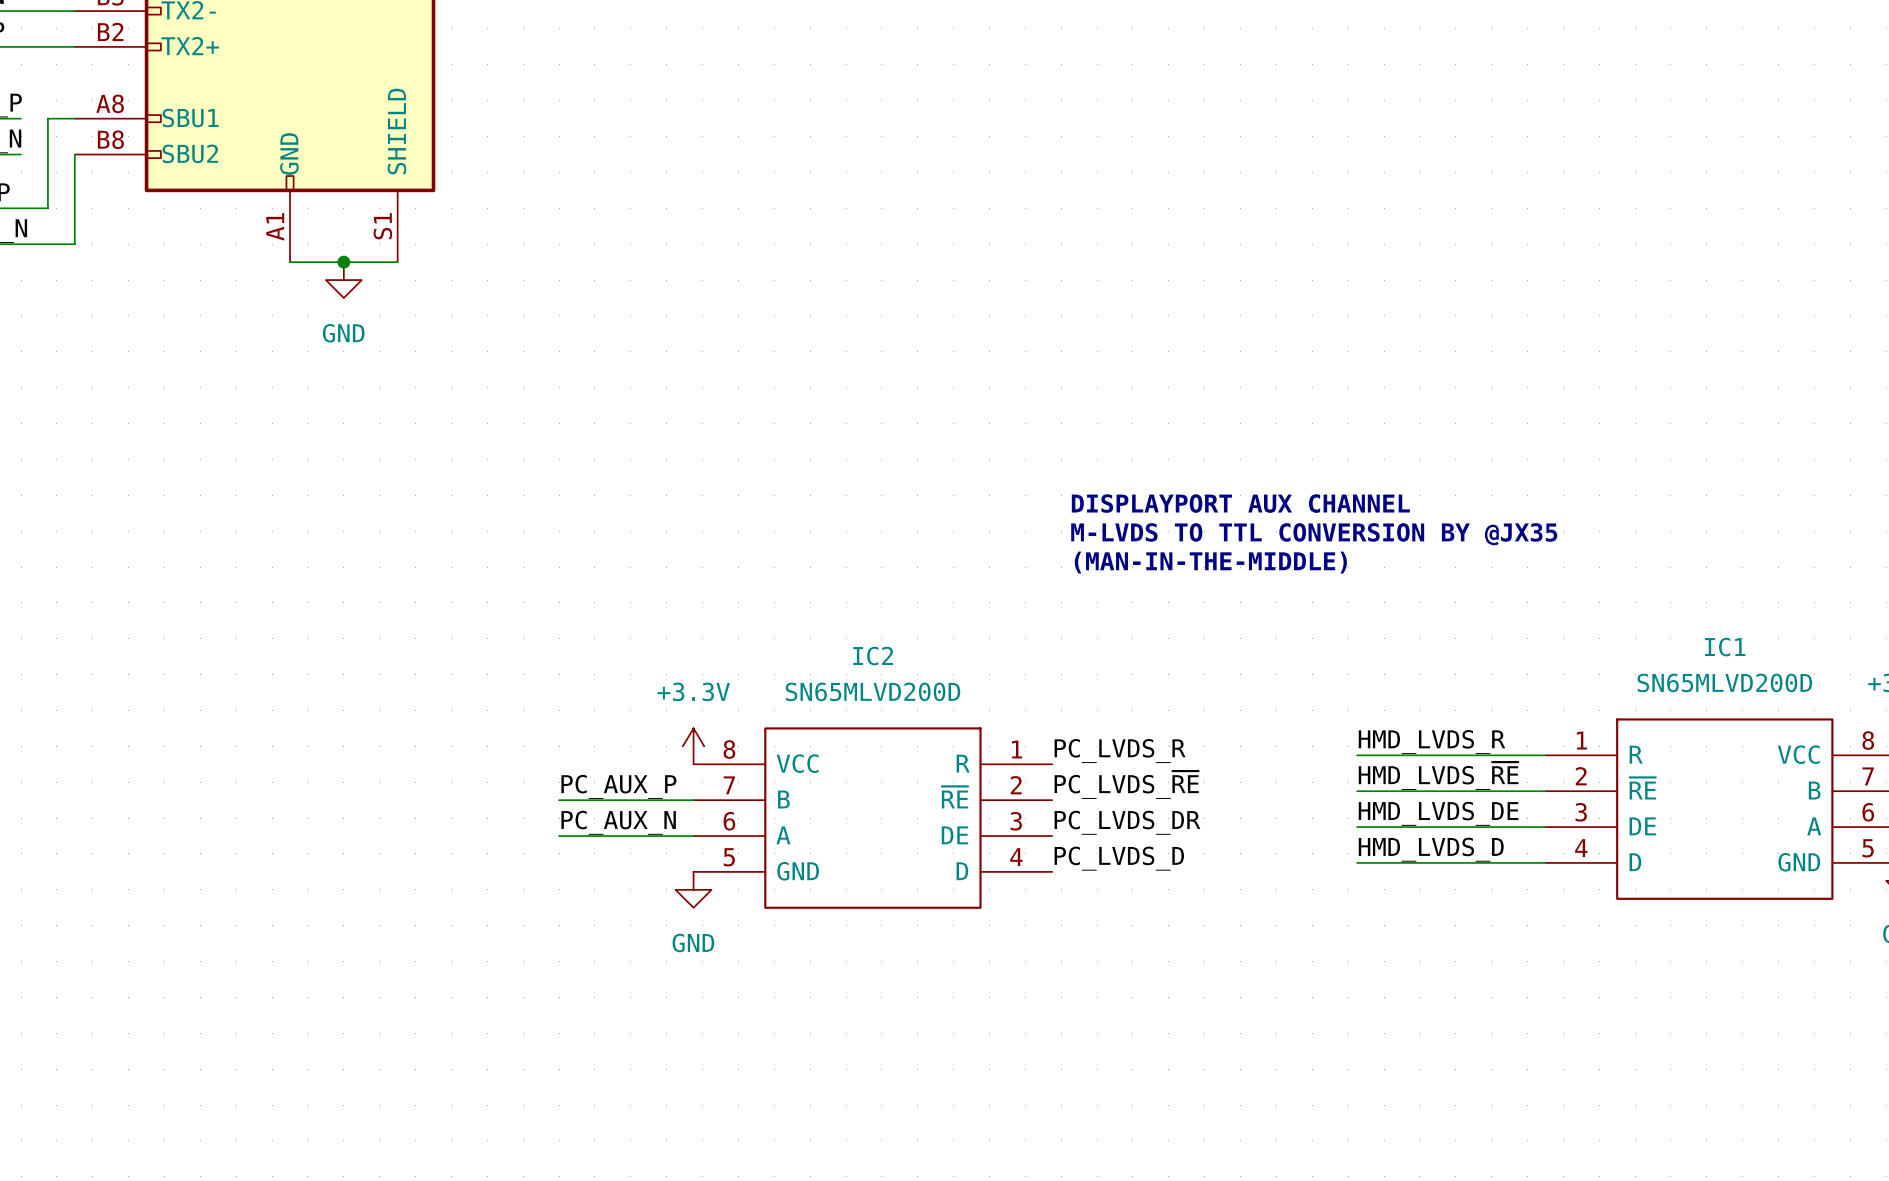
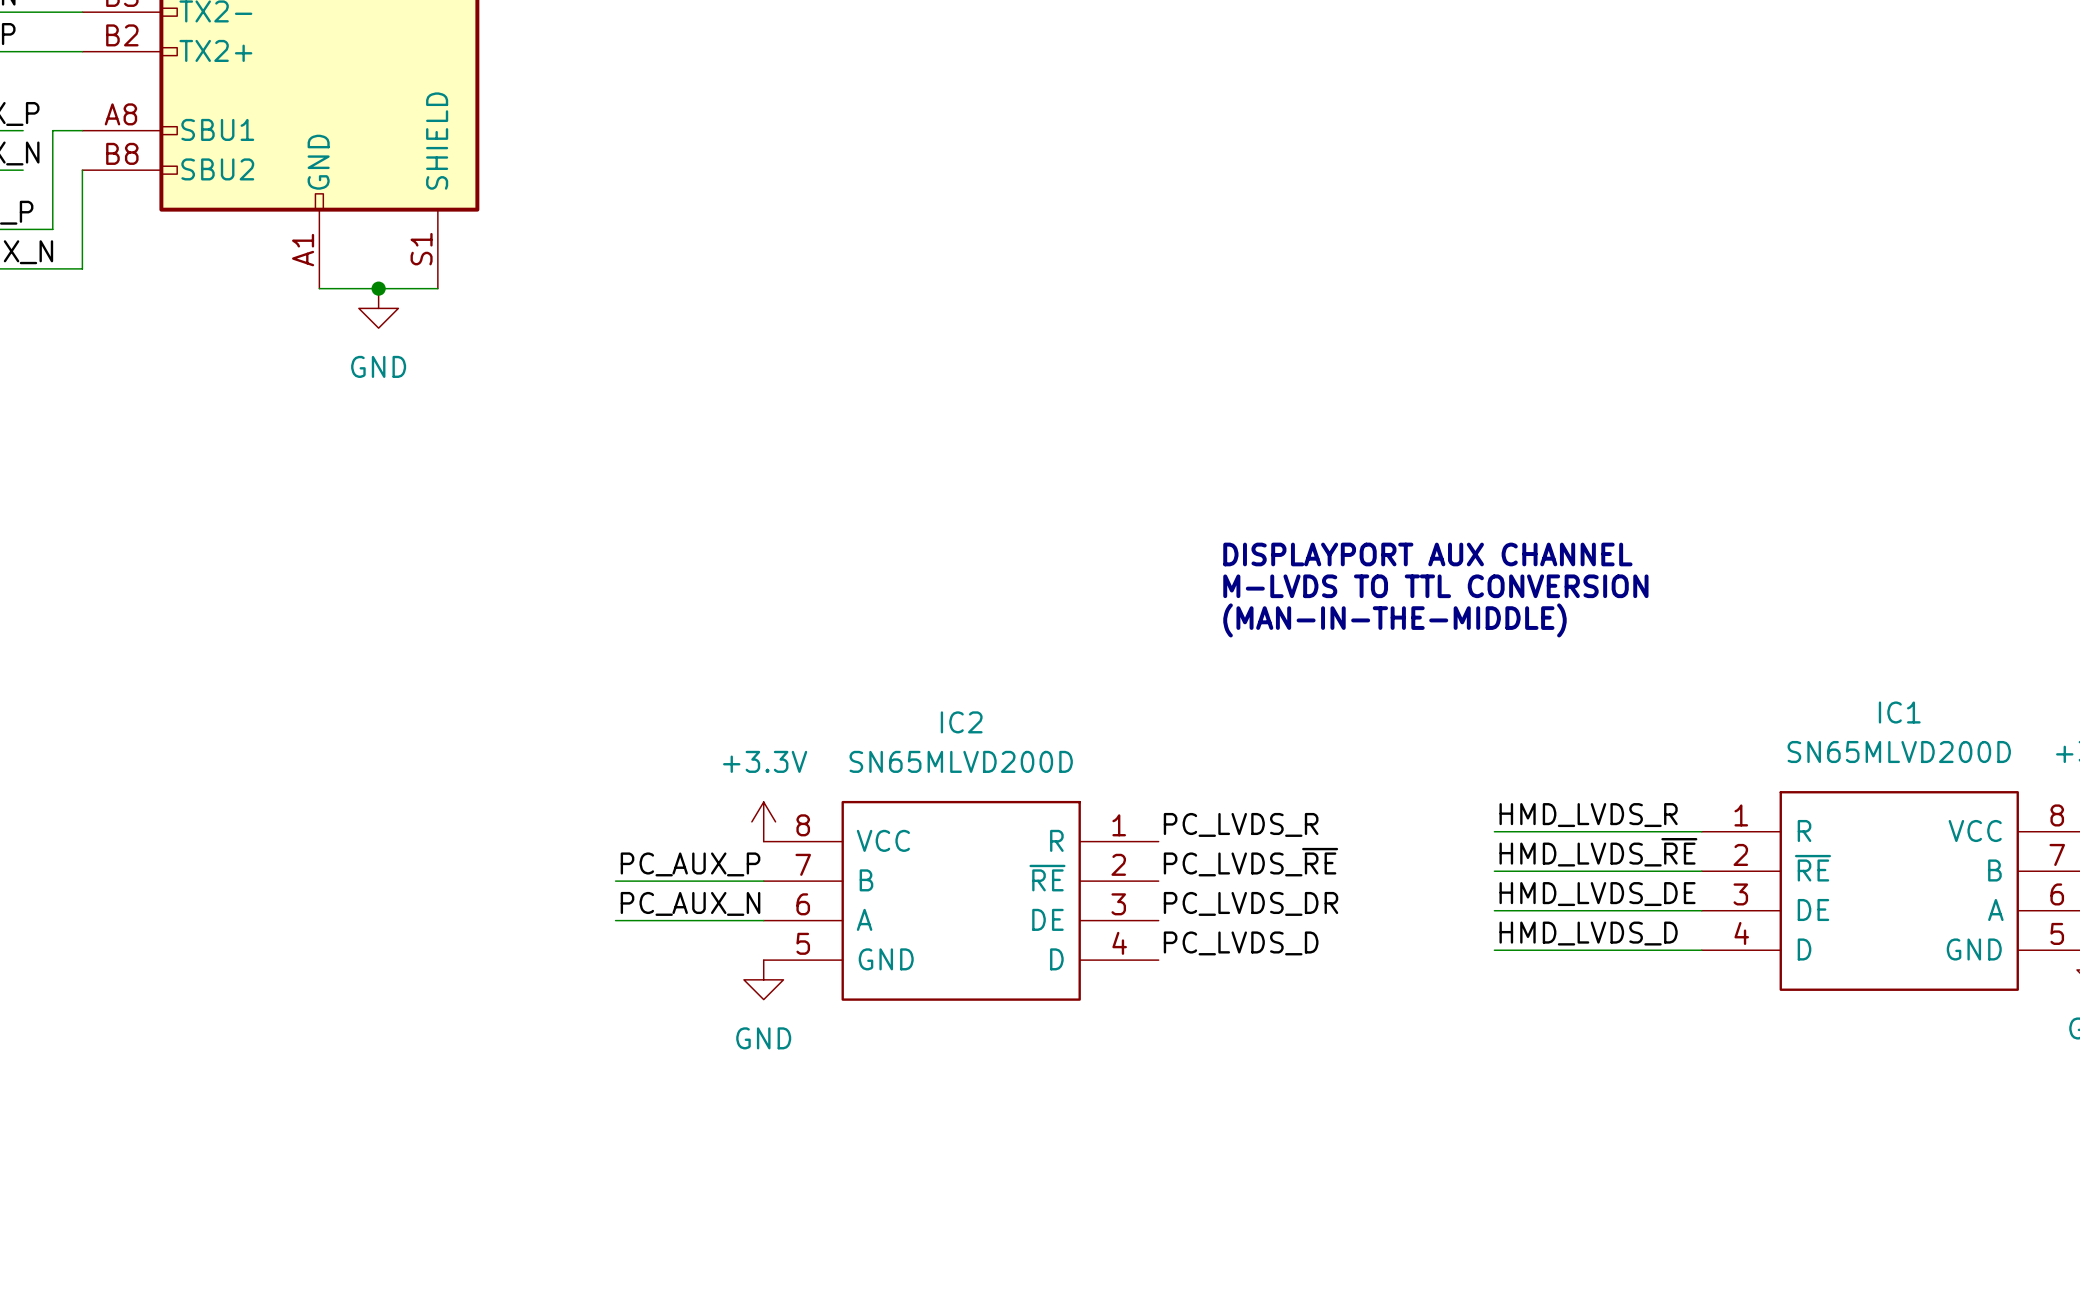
text position: DISPLAYPORT AUX CHANNEL (1240, 503) -> DISPLAYPORT AUX CHANNEL (1427, 554)
text: M-LVDS TO TTL CONVERSION BY @JX35 (1314, 534) -> M-LVDS TO TTL CONVERSION (1435, 586)
text position: (MAN-IN-THE-MIDDLE) (1210, 562) -> (MAN-IN-THE-MIDDLE) (1394, 620)

